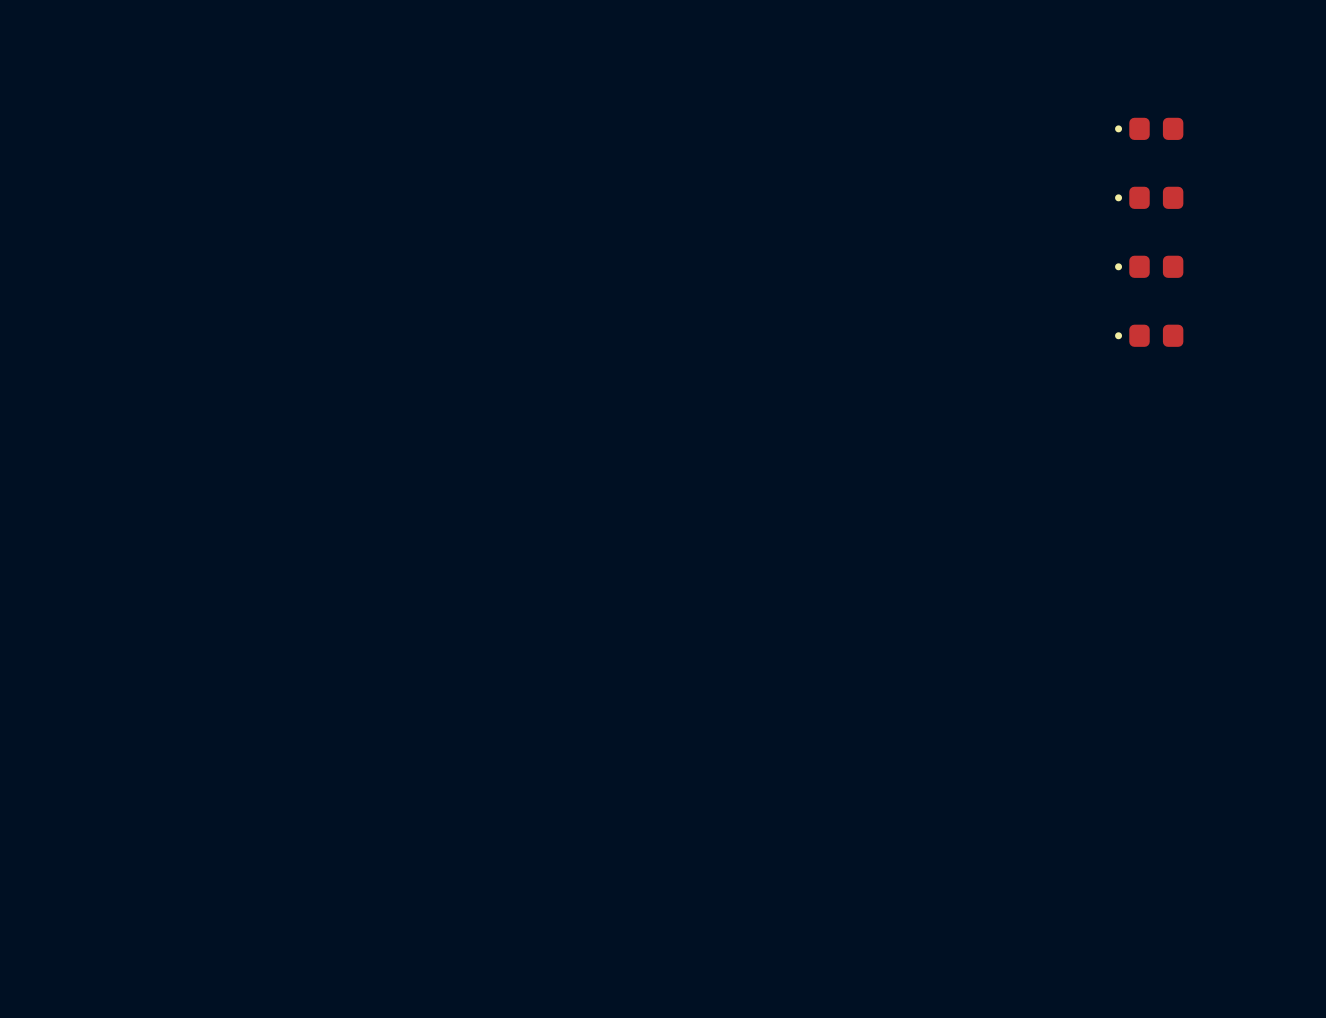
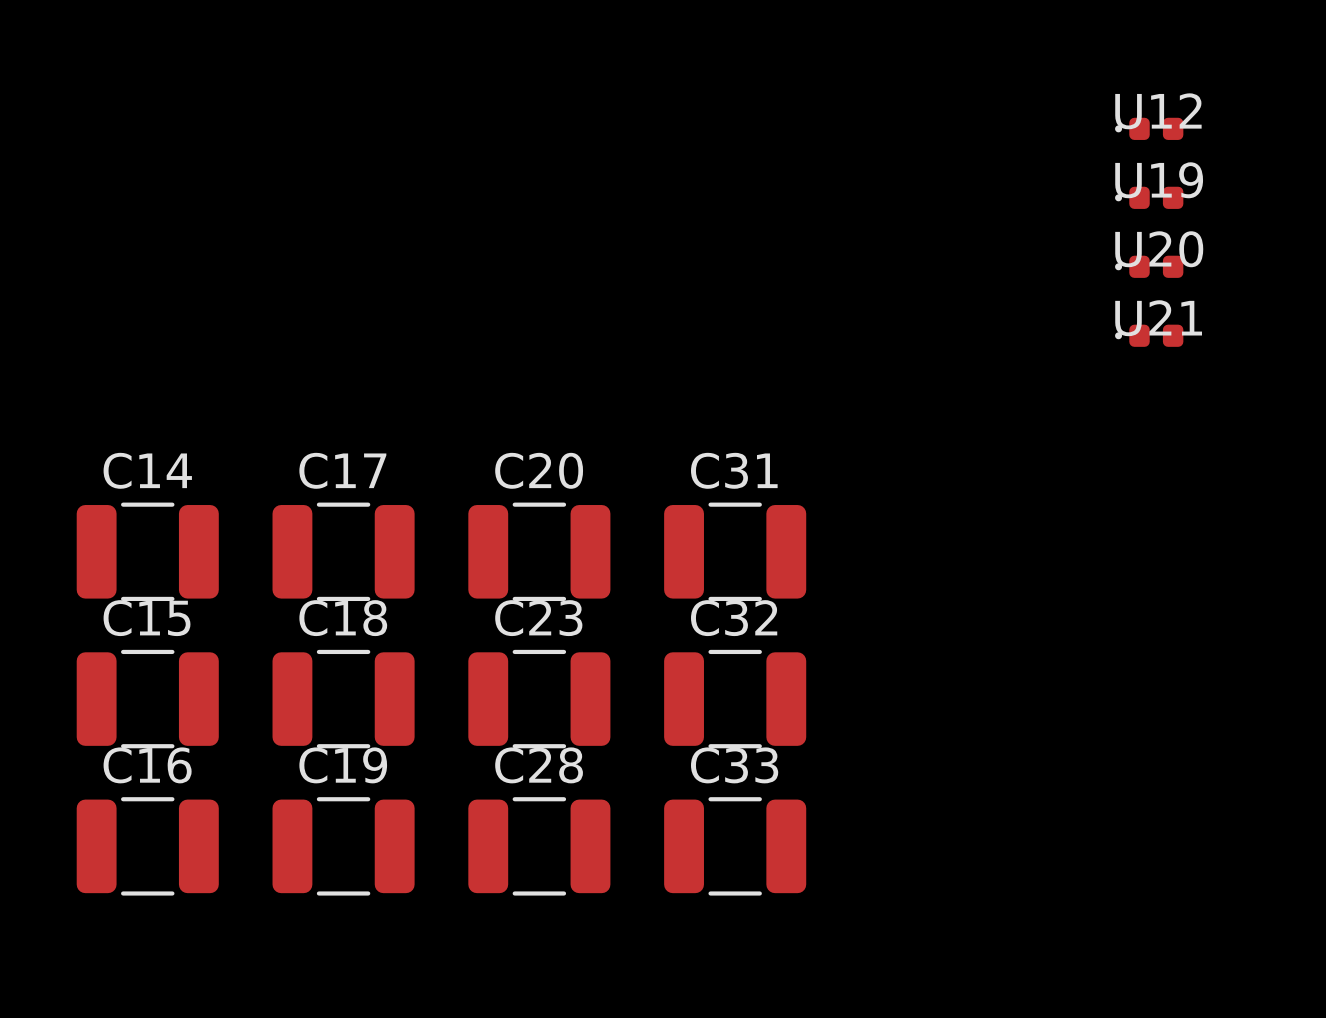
U12 name: none -> U12 (1158, 111)
U19 name: none -> U19 (1159, 180)
U20 name: none -> U20 (1159, 249)
U21 name: none -> U21 (1158, 318)
C14: none -> (147, 551)
C17: none -> (343, 551)
C20: none -> (539, 551)
C31: none -> (735, 551)
C15: none -> (147, 699)
C18: none -> (343, 699)
C23: none -> (539, 699)
C32: none -> (735, 699)
C16: none -> (147, 846)
C19: none -> (343, 846)
C28: none -> (539, 846)
C33: none -> (735, 846)

